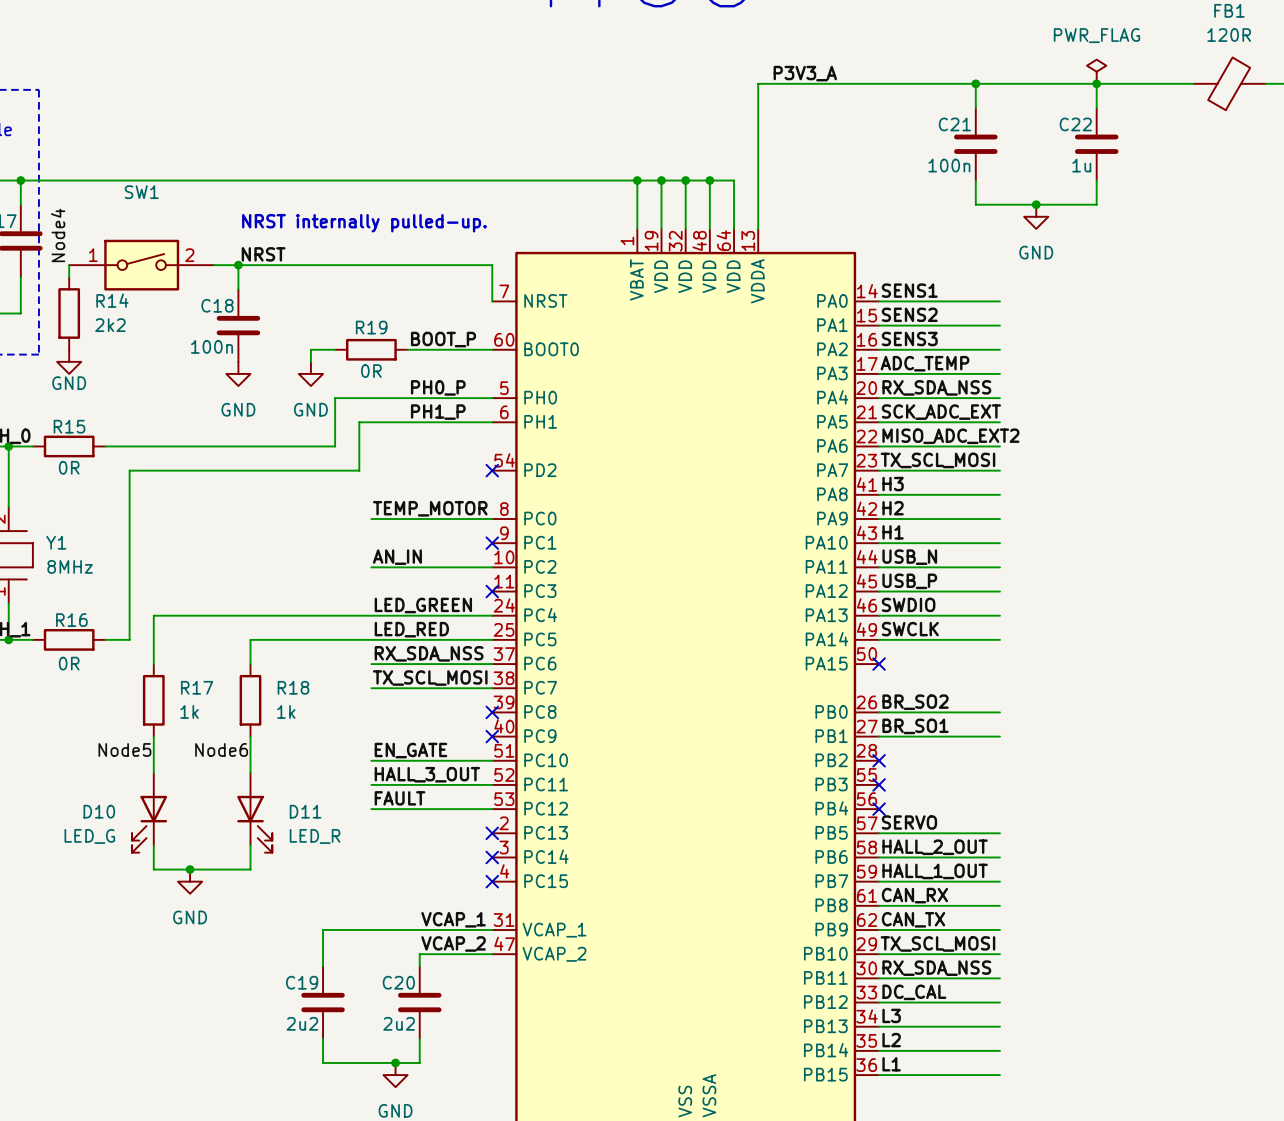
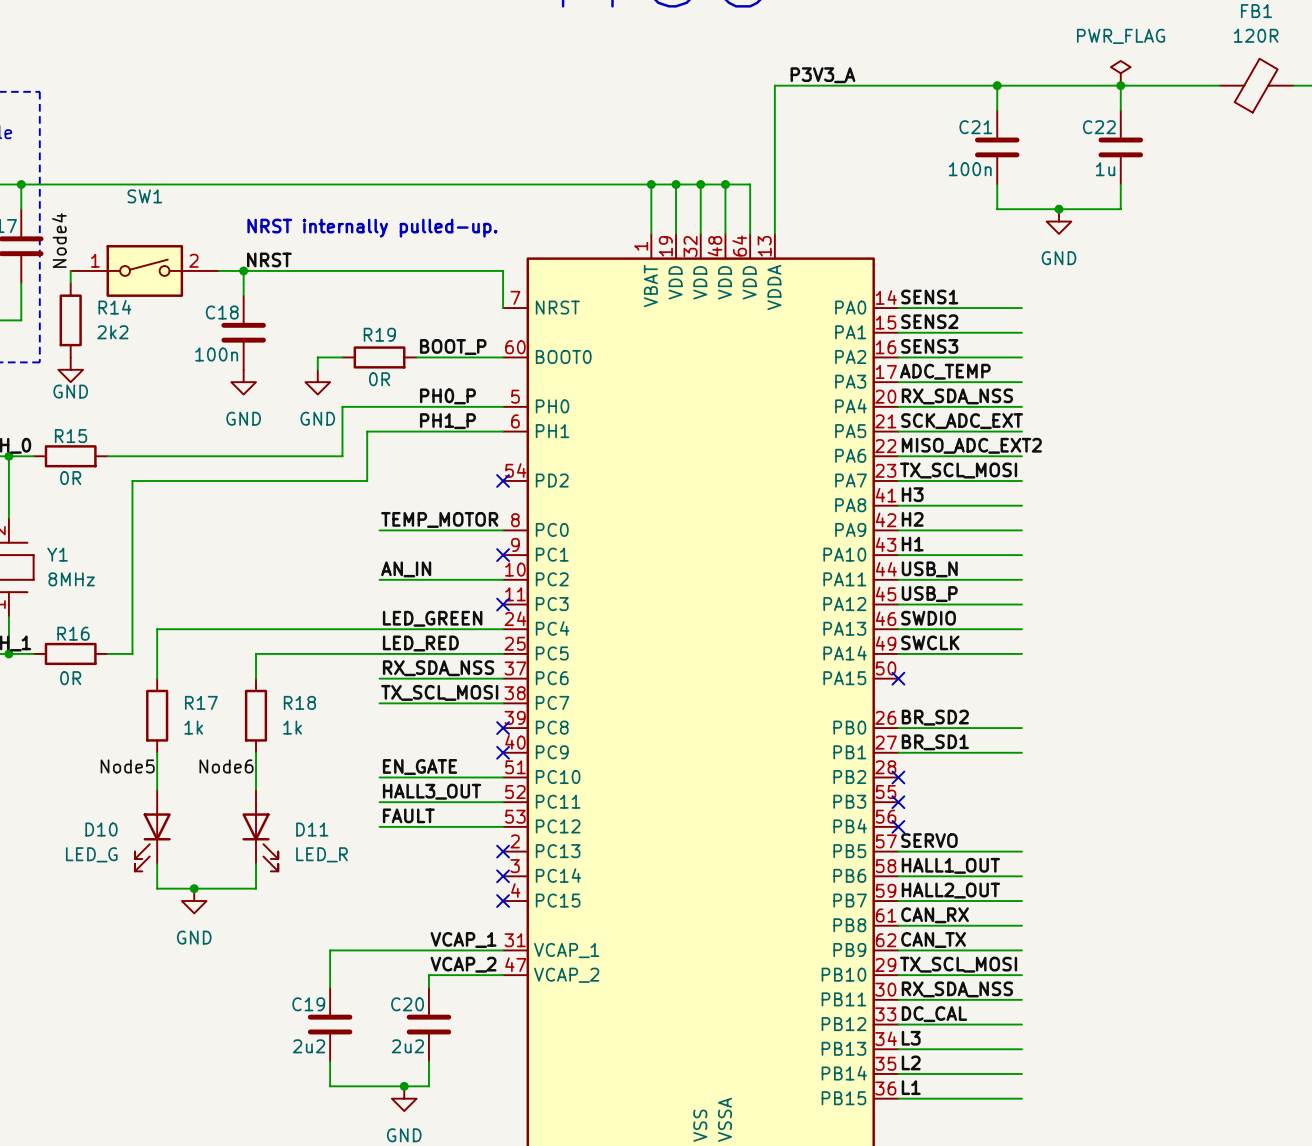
label: BR_SO2 (915, 702) -> BR_SD2 (935, 717)
label: BR_SO1 (915, 726) -> BR_SD1 (935, 742)
label: HALL_3_OUT (427, 774) -> HALL3_OUT (432, 791)
label: HALL_2_OUT (935, 847) -> HALL1_OUT (950, 865)
label: HALL_1_OUT (935, 871) -> HALL2_OUT (950, 890)

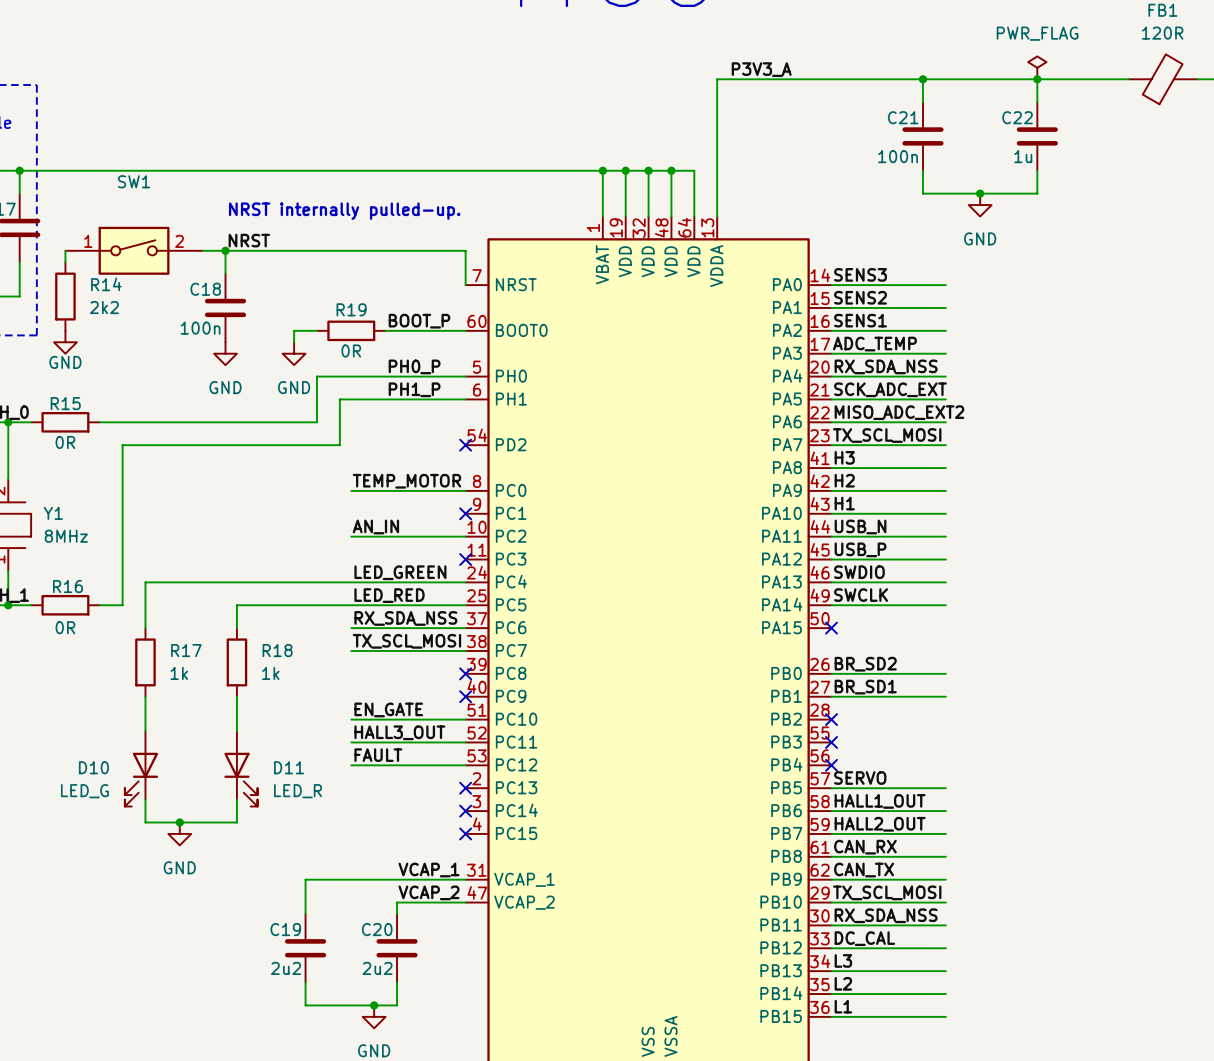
label: Node4 (59, 240) -> none
label: SENS1 (929, 297) -> SENS3 (860, 274)
label: SENS3 (929, 346) -> SENS1 (860, 320)
label: Node5 (127, 766) -> none
label: Node6 (226, 766) -> none

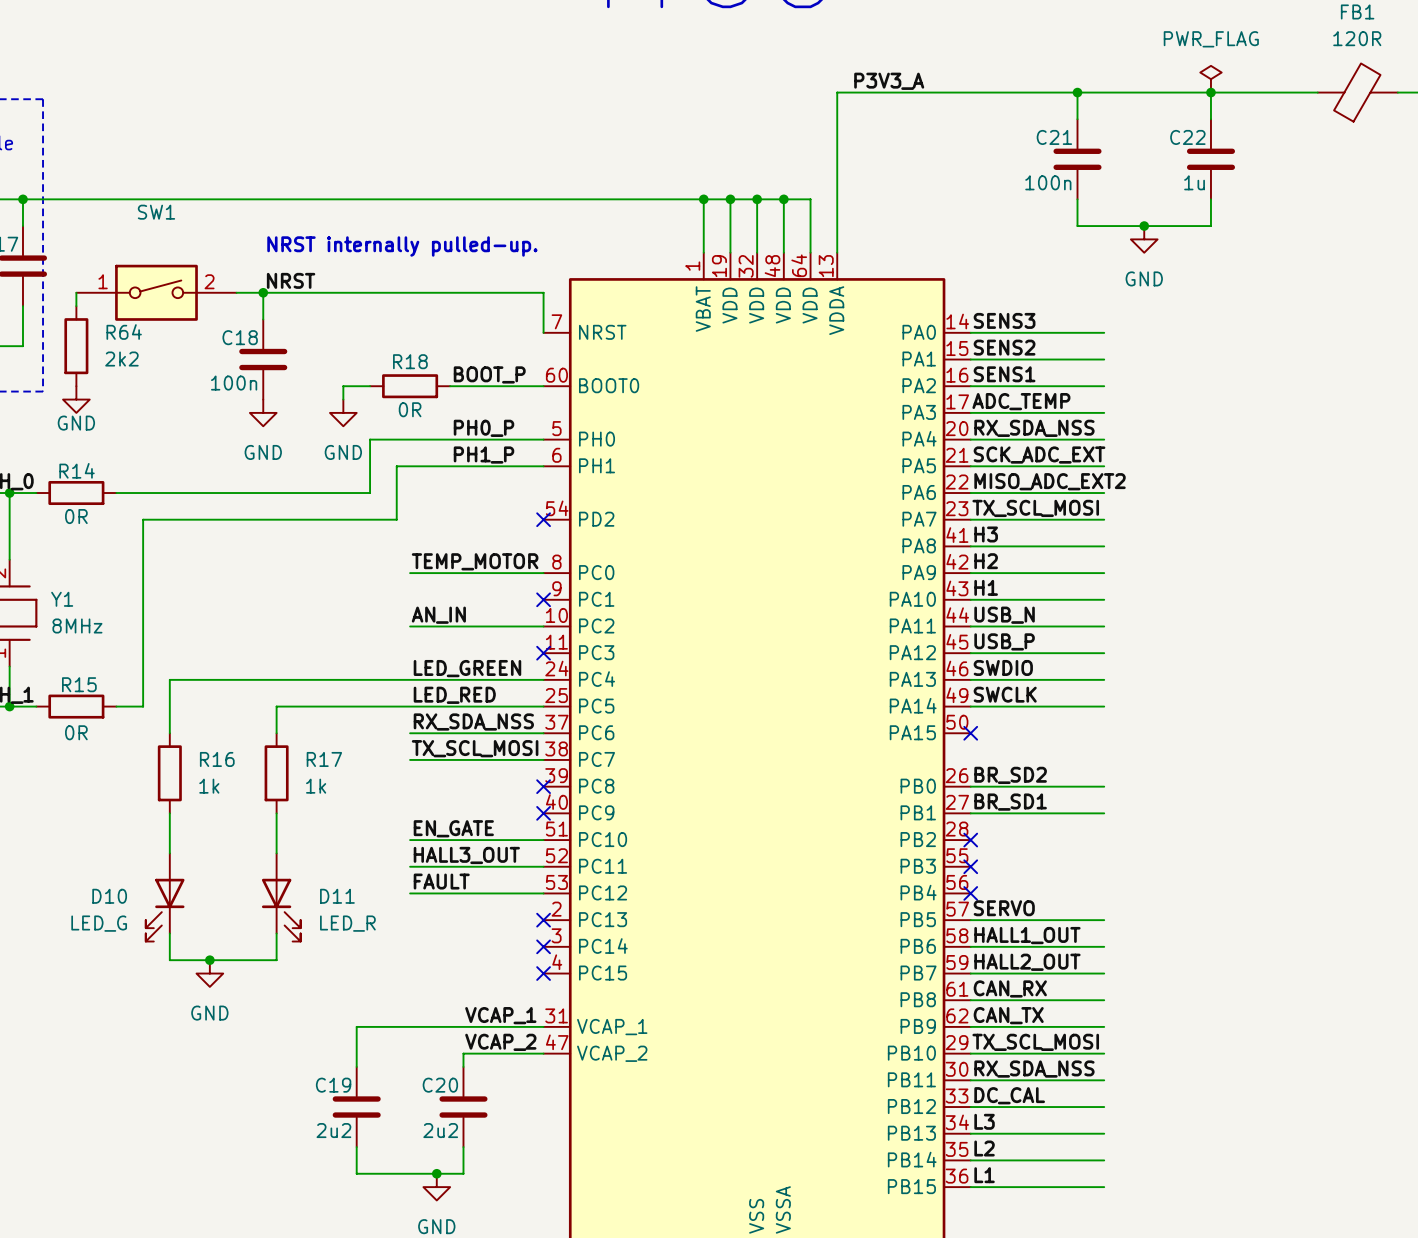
R14 name: R14 (106, 284) -> R64 (124, 332)
R19 name: R19 (351, 309) -> R18 (410, 361)
R15 name: R15 (65, 403) -> R14 (77, 470)
R16 name: R16 (67, 586) -> R15 (79, 684)
R17 name: R17 (186, 650) -> R16 (217, 759)
R18 name: R18 (277, 650) -> R17 (324, 759)

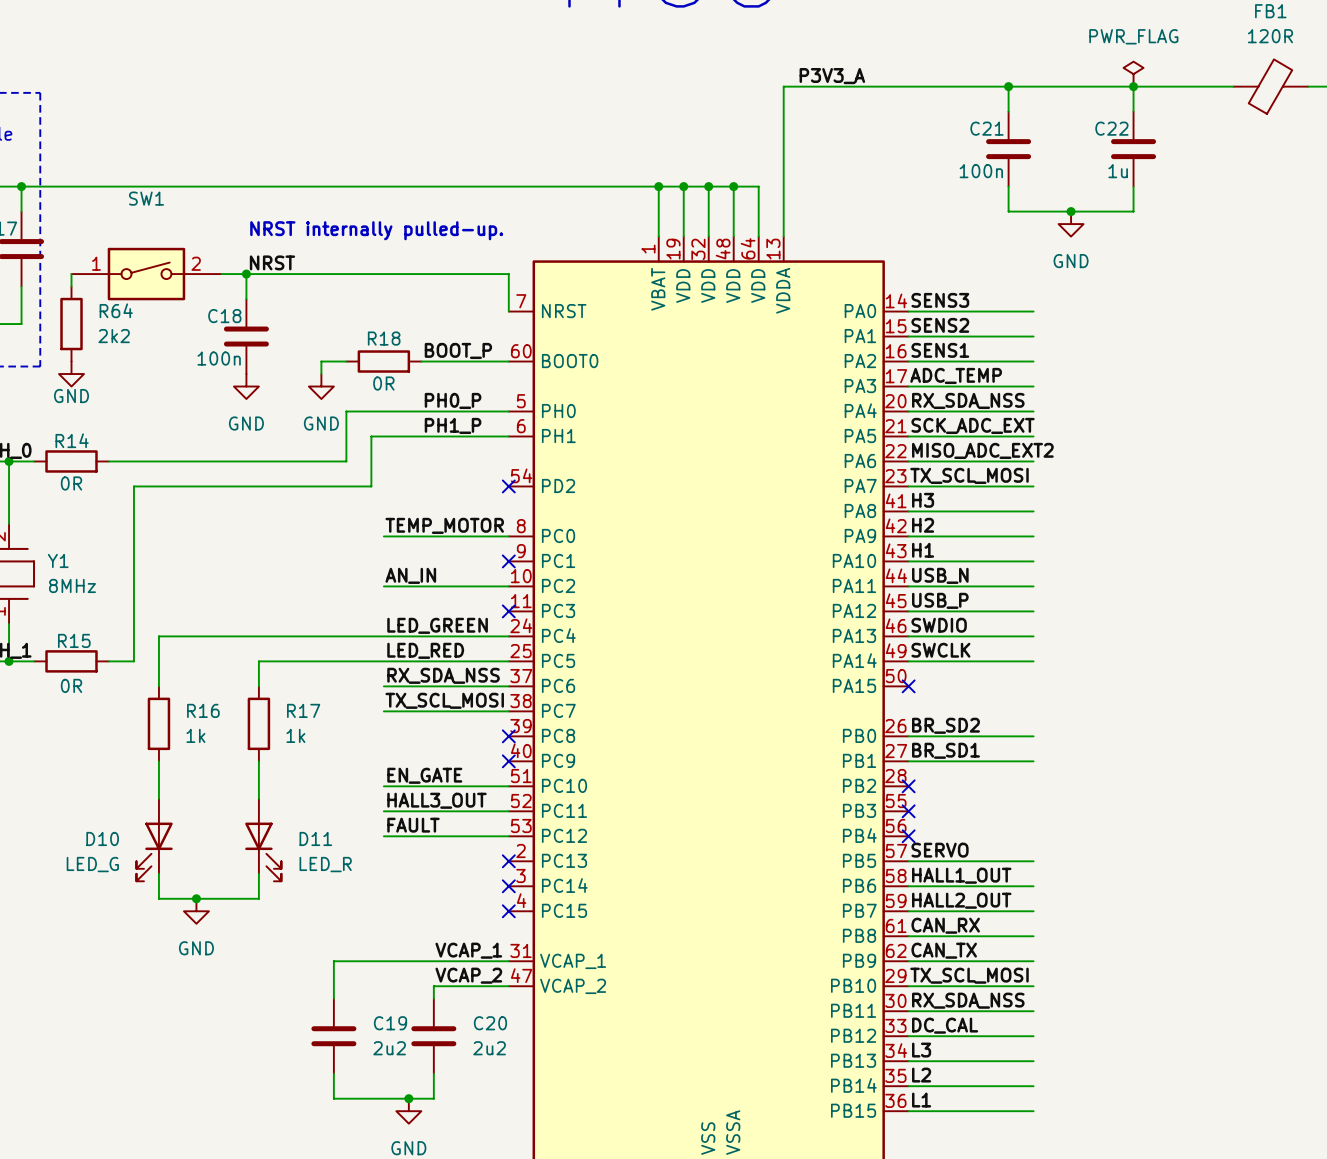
C19 name position: C19 (333, 1085) -> C19 (390, 1023)
C20 name position: C20 (440, 1085) -> C20 (490, 1023)
C19 value position: 2u2 (333, 1130) -> 2u2 (389, 1048)
C20 value position: 2u2 (440, 1130) -> 2u2 (489, 1048)

